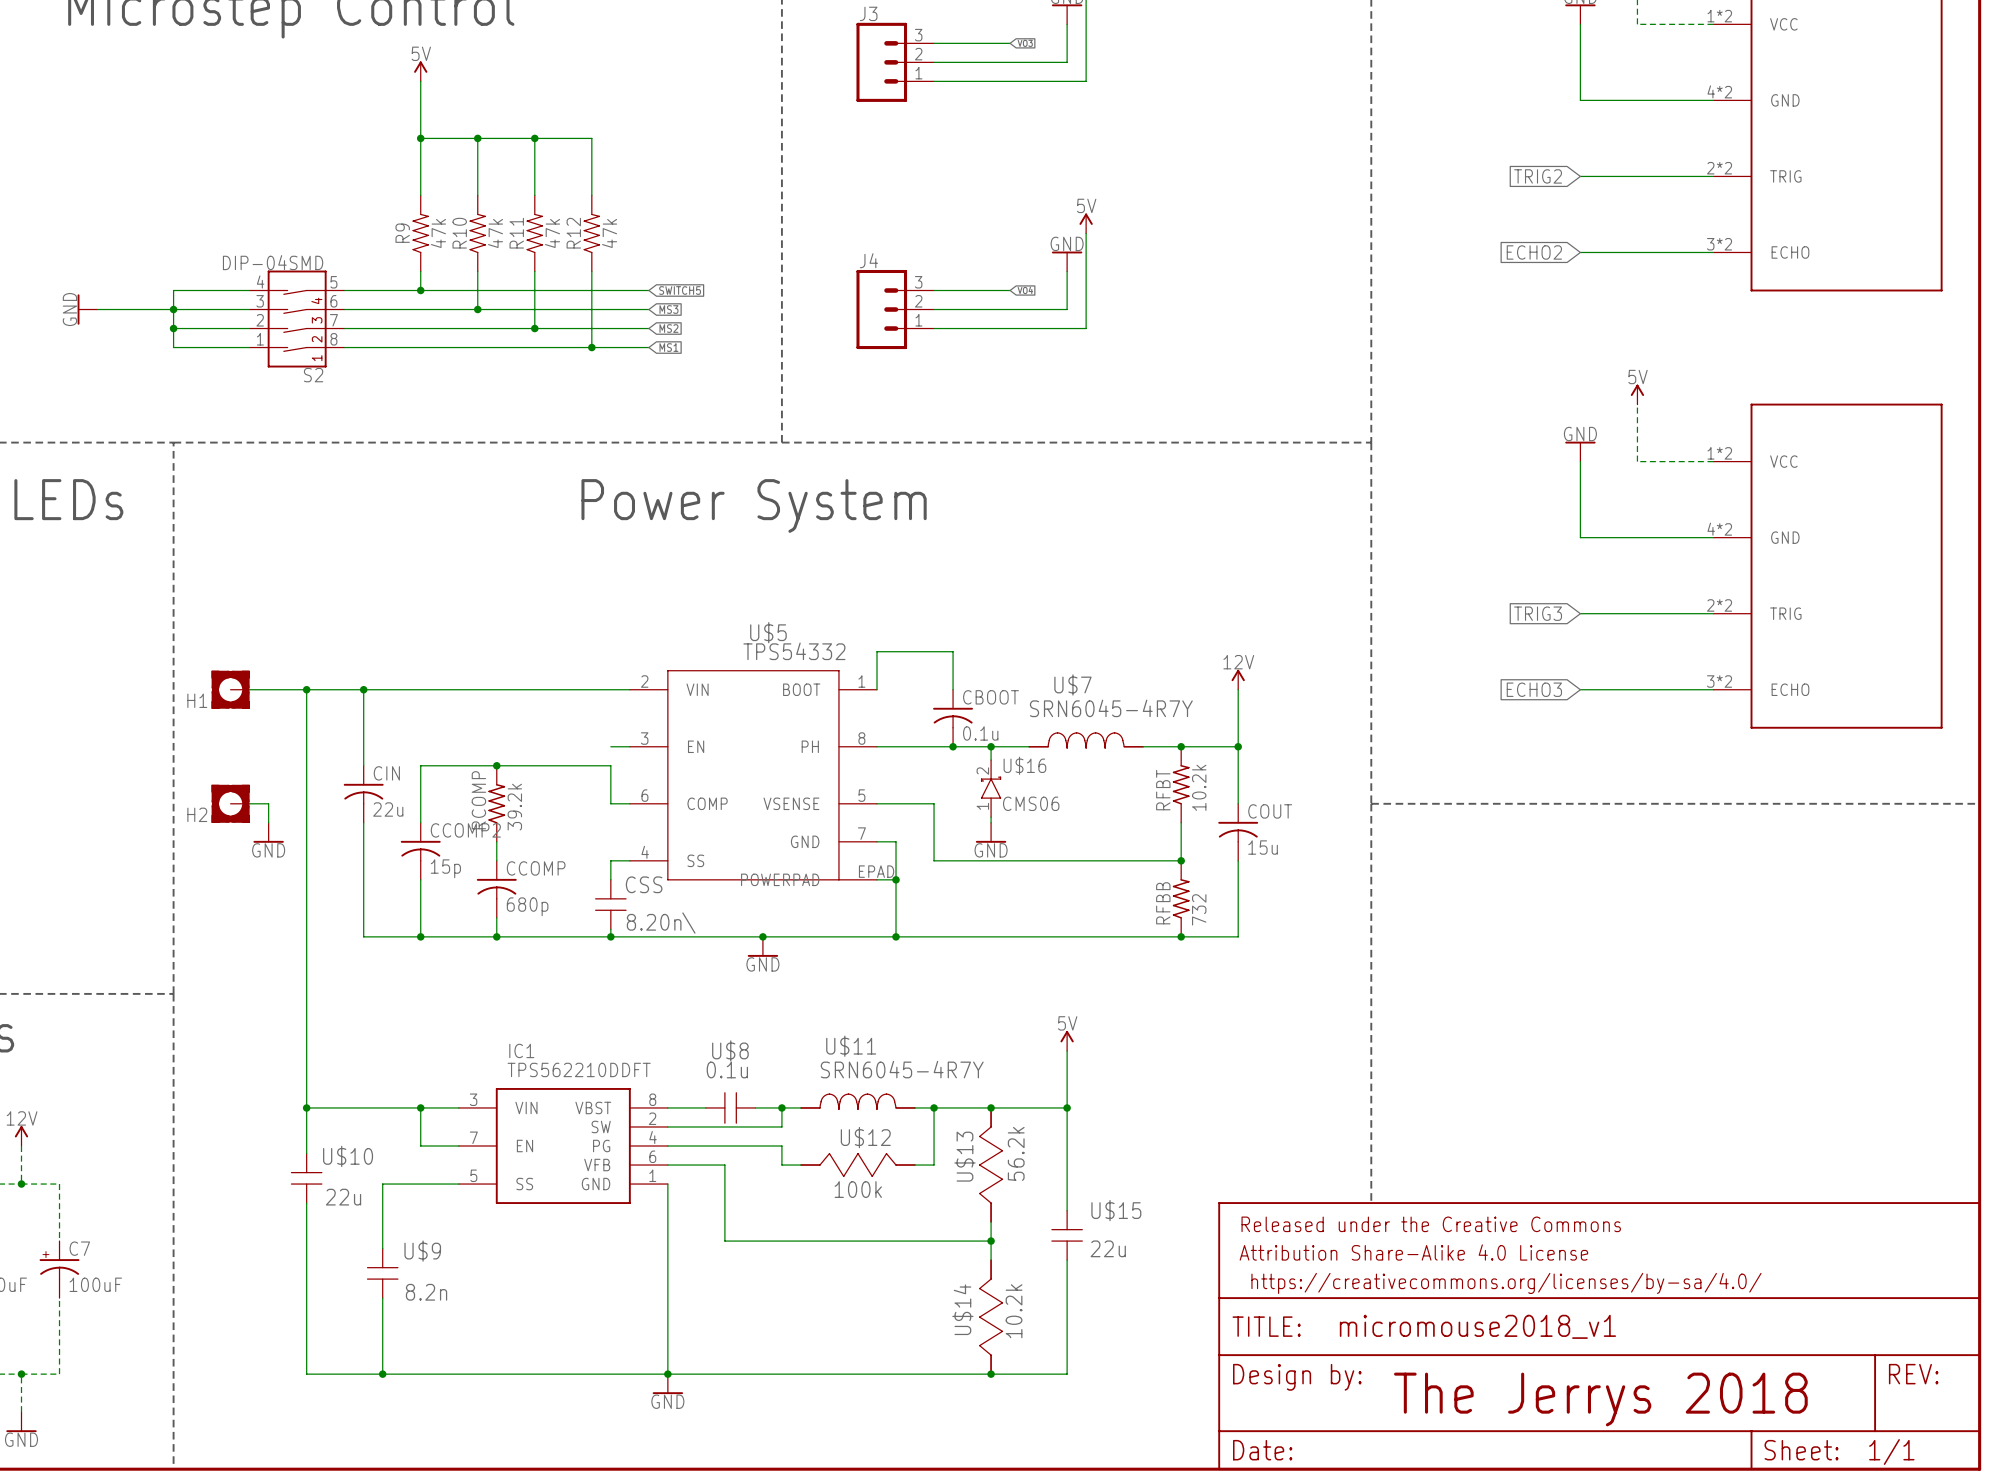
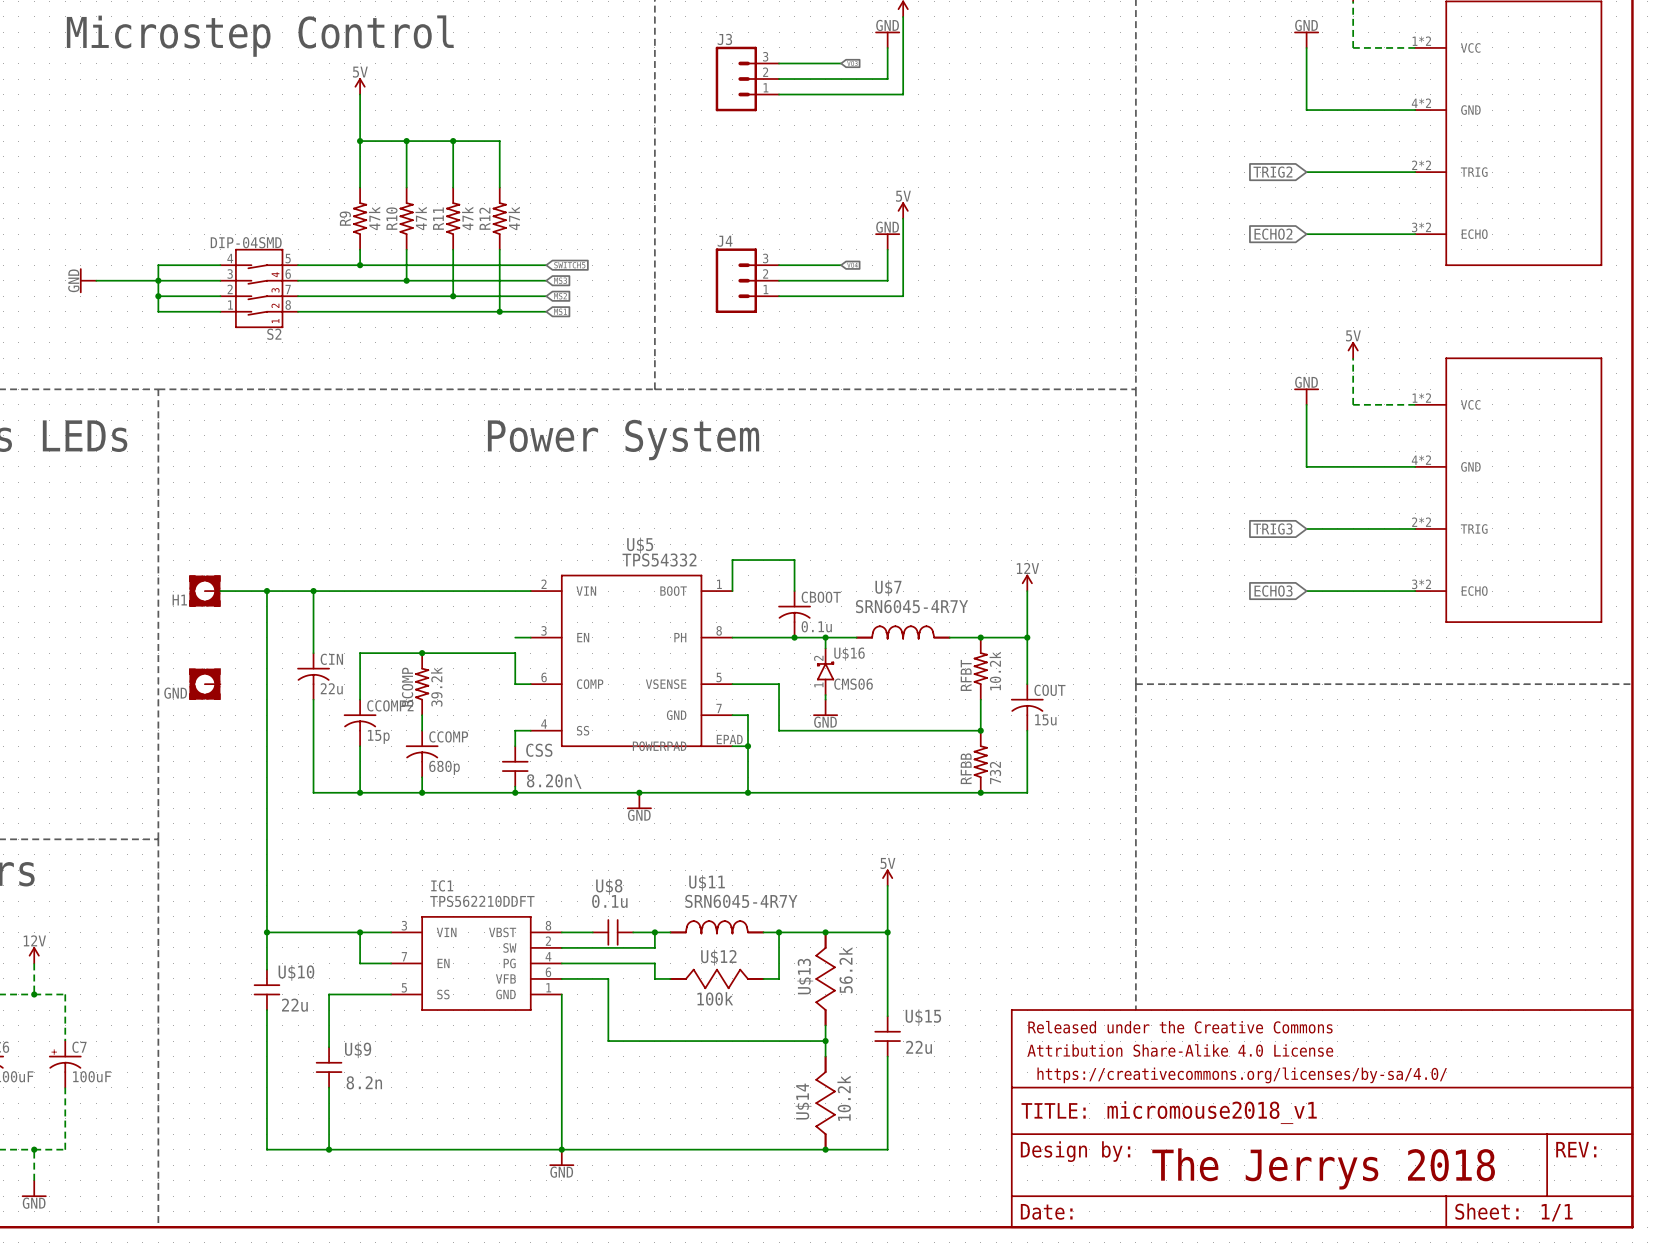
wire: (249, 803) (268, 803) (268, 822) -> none
H2 name: H2 (197, 814) -> GND (175, 693)
power symbol: GND (268, 832) -> none

